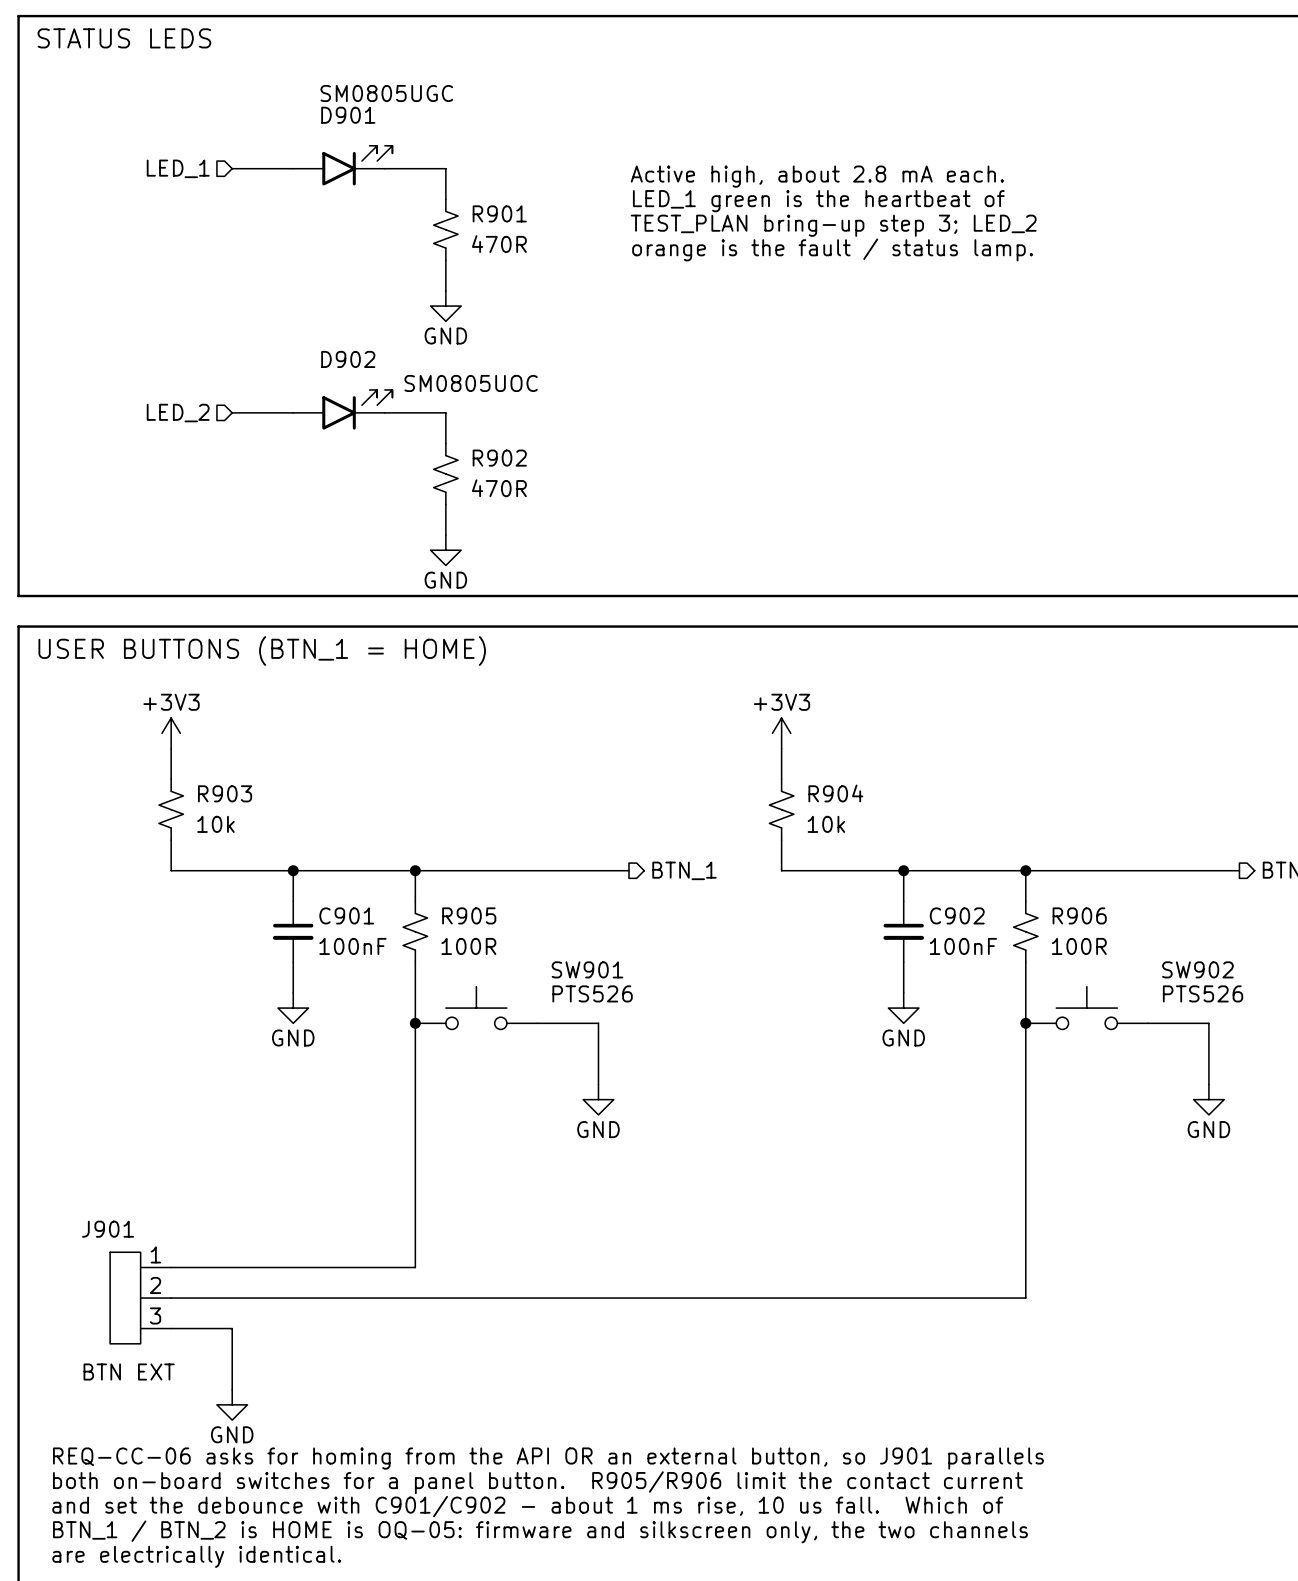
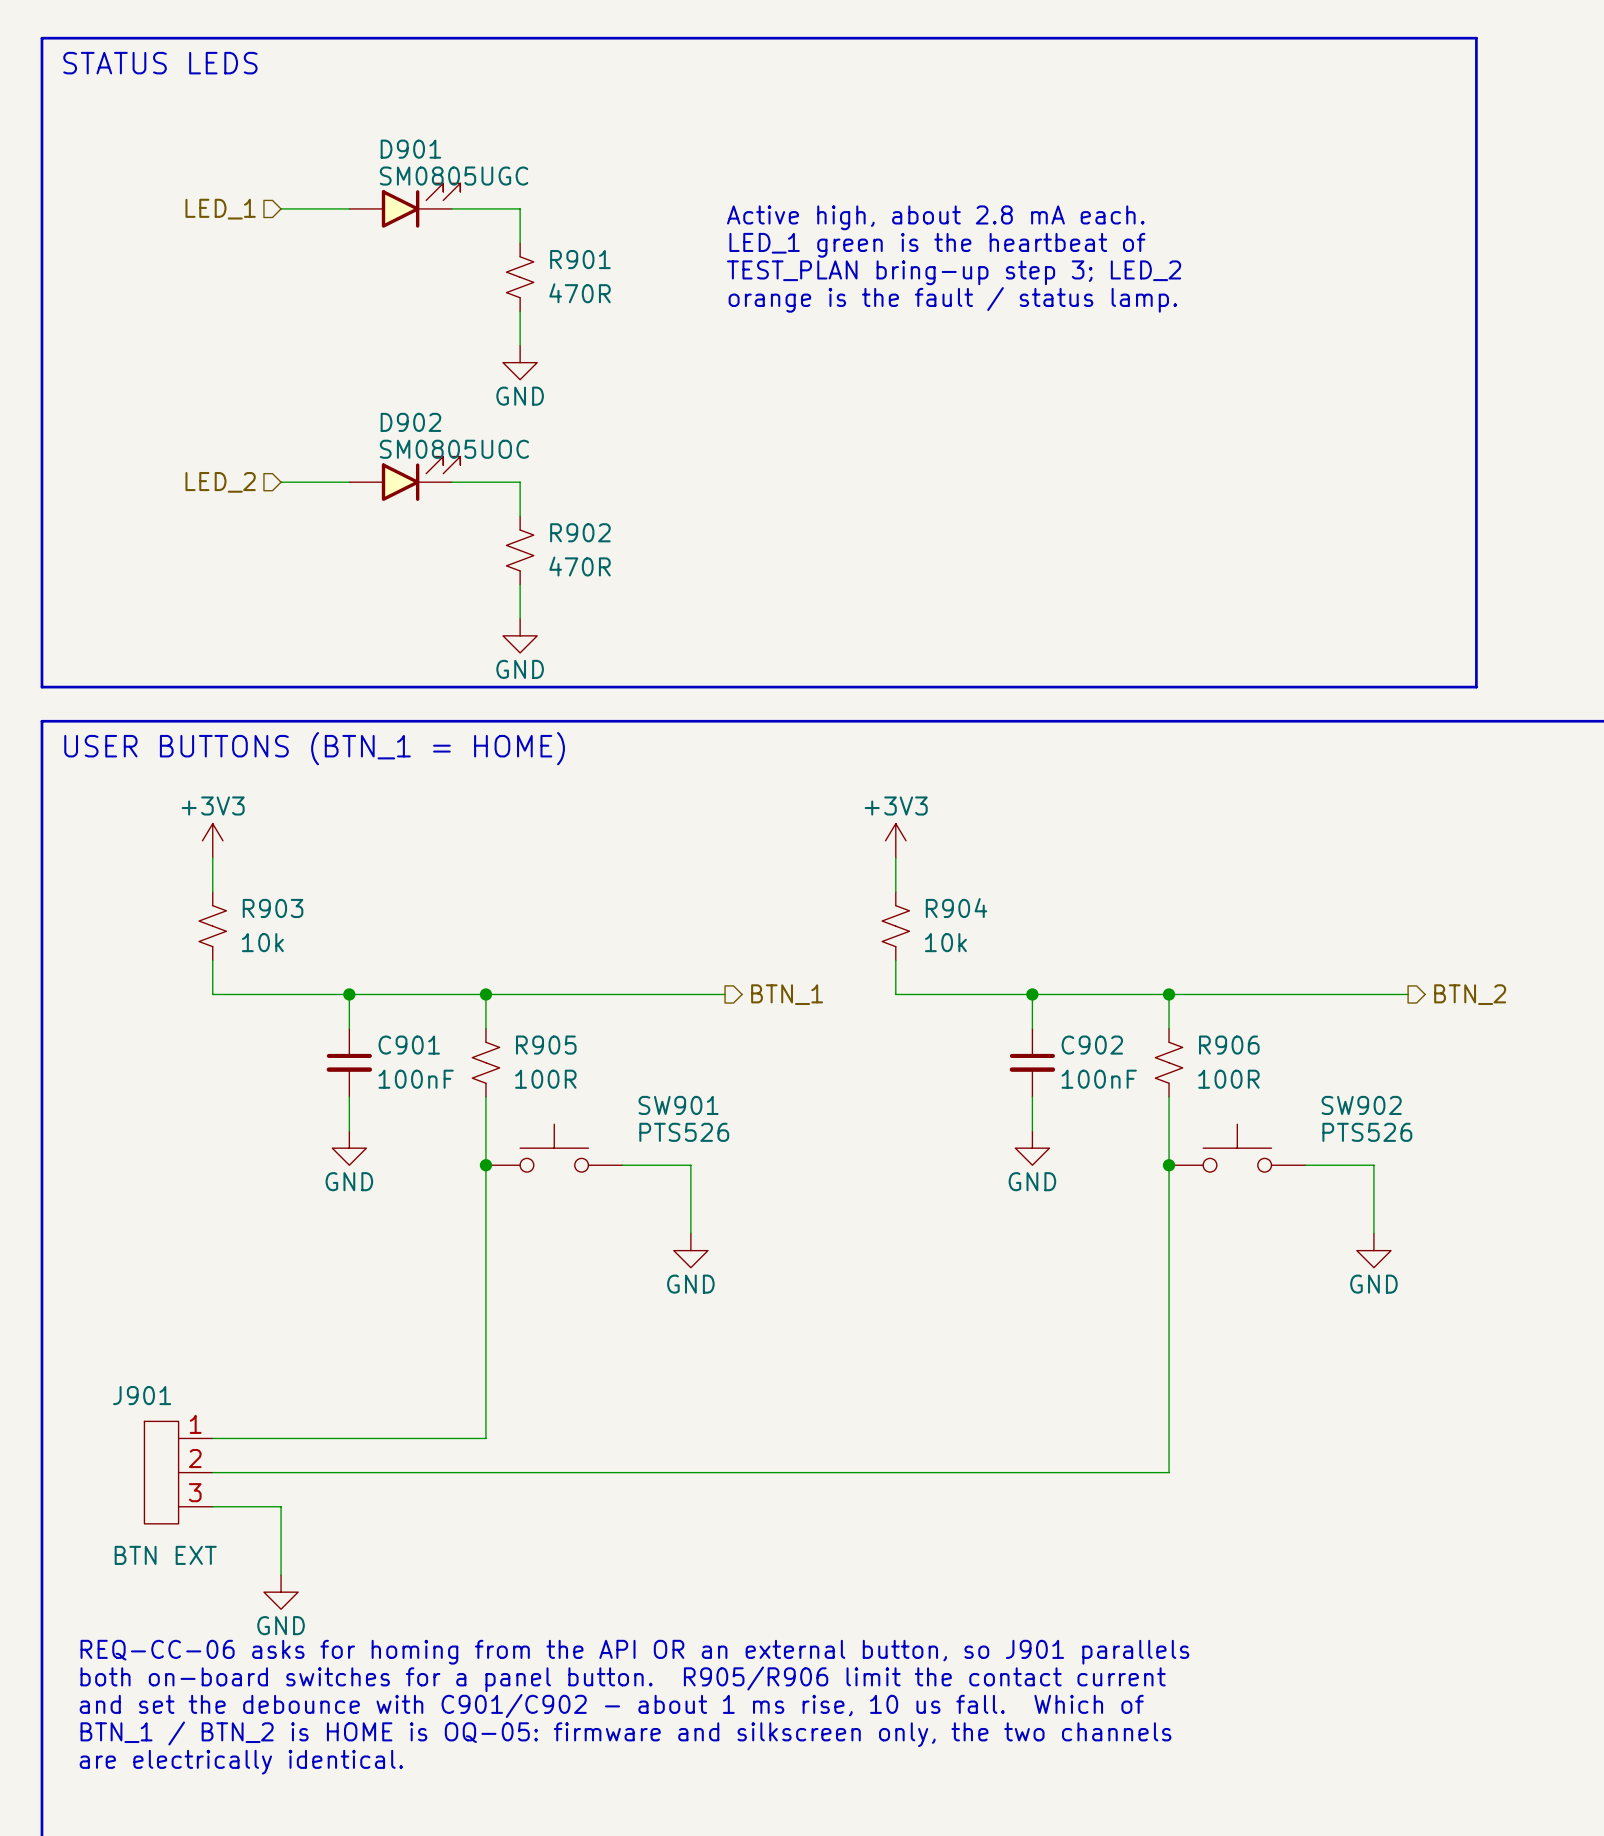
D901 value position: SM0805UGC (386, 93) -> SM0805UGC (454, 176)
D902 value position: SM0805UOC (471, 383) -> SM0805UOC (454, 449)

